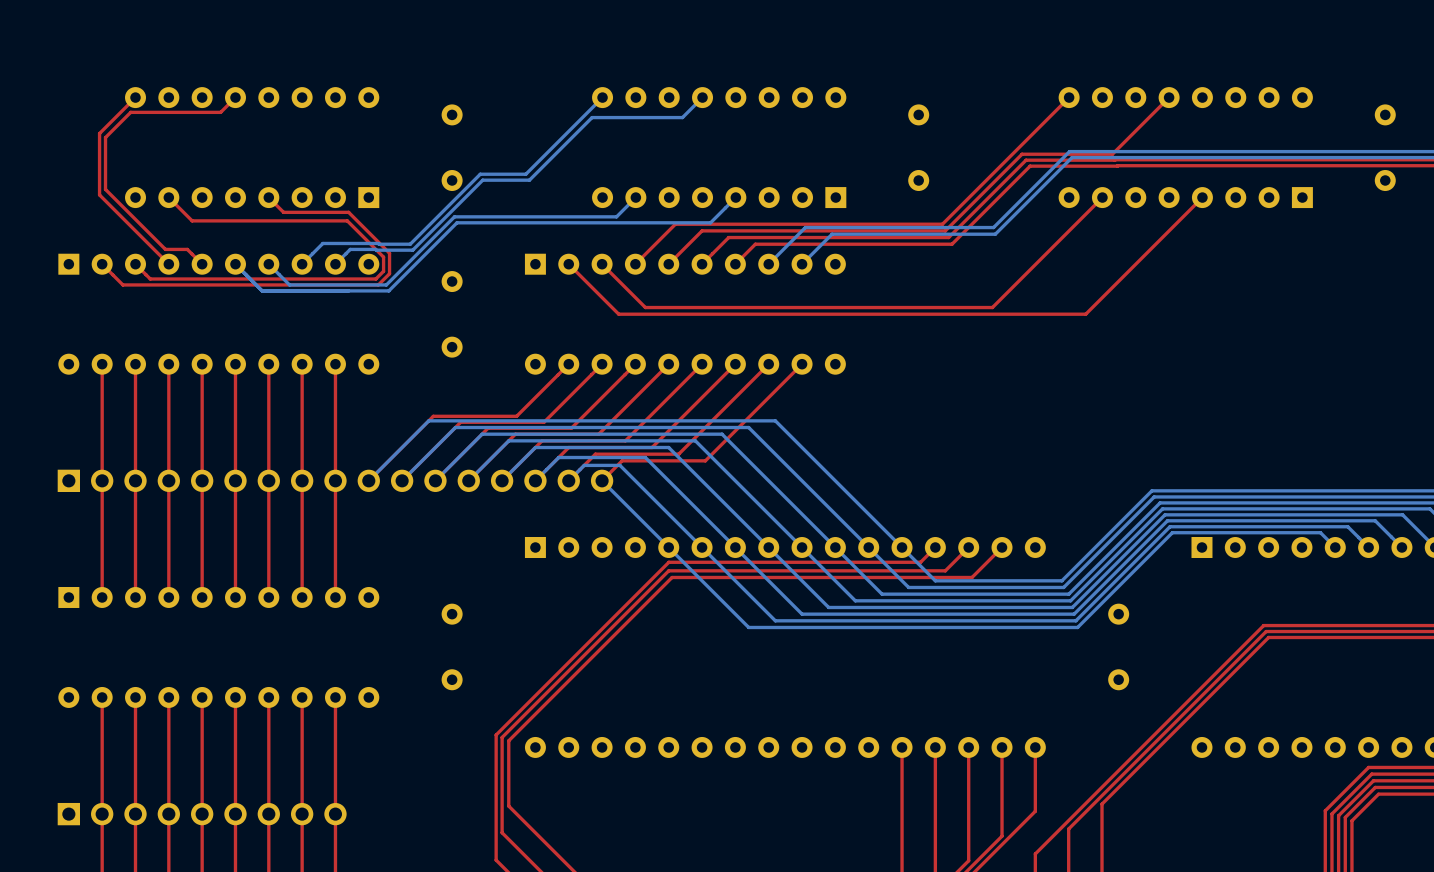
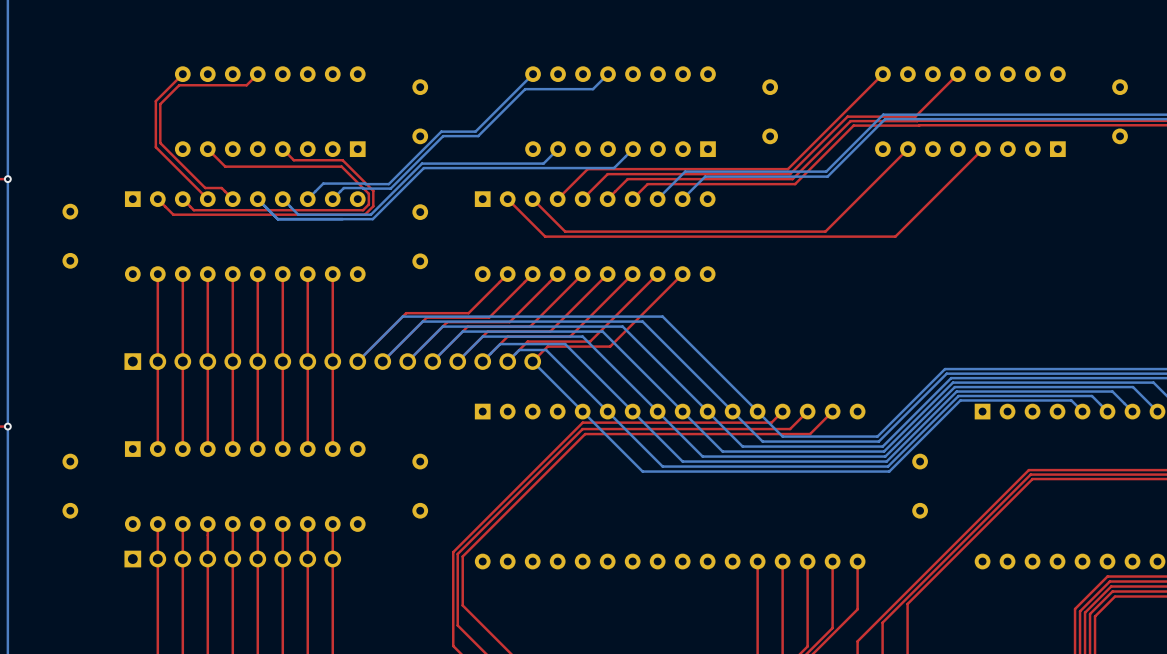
part position: (202, 814) -> (232, 559)

